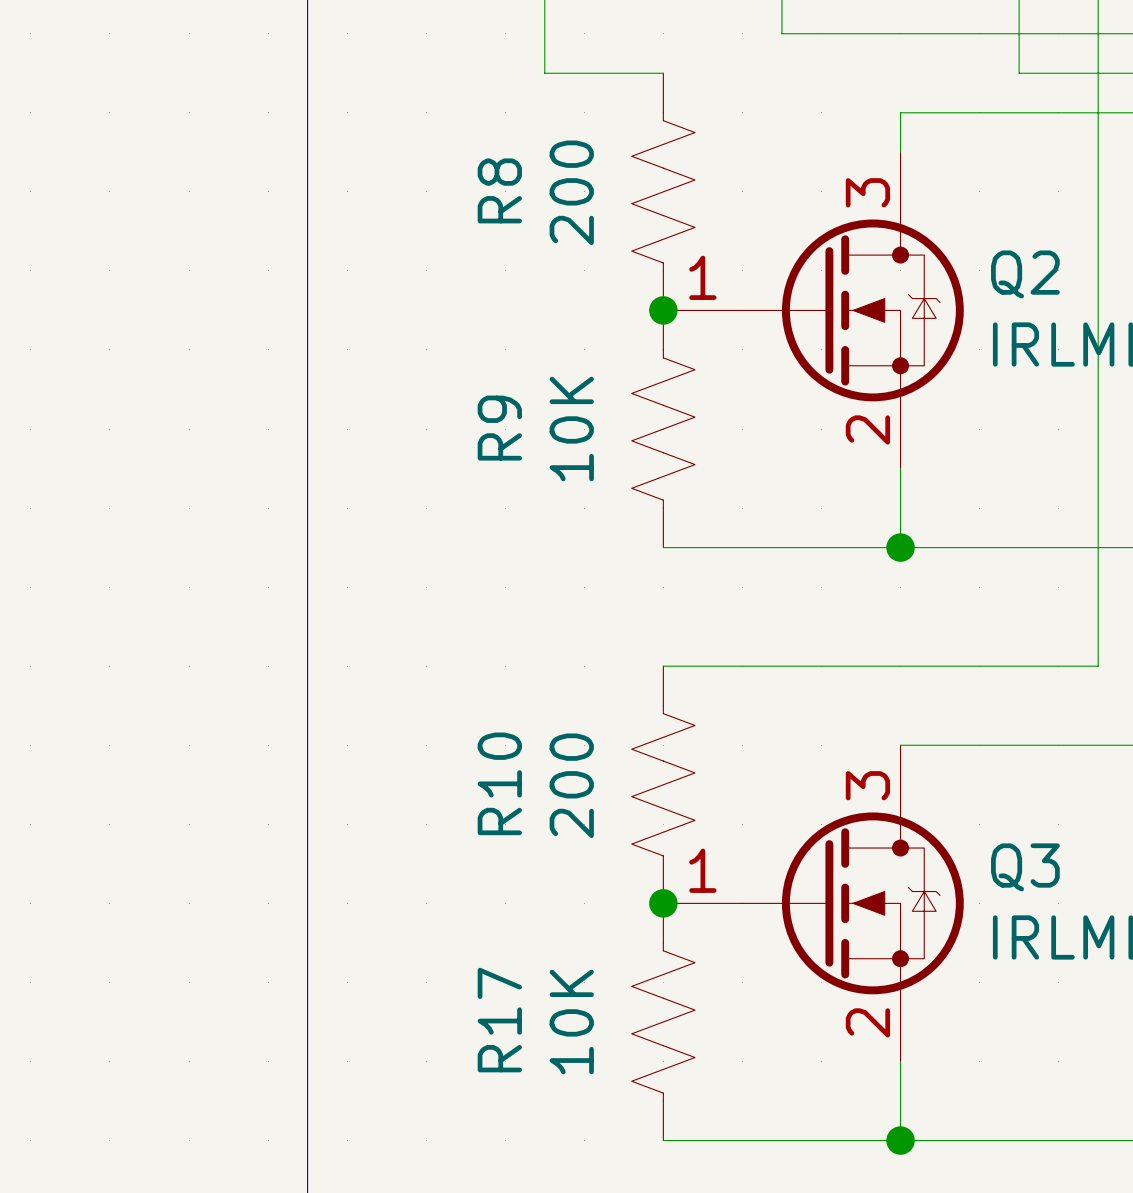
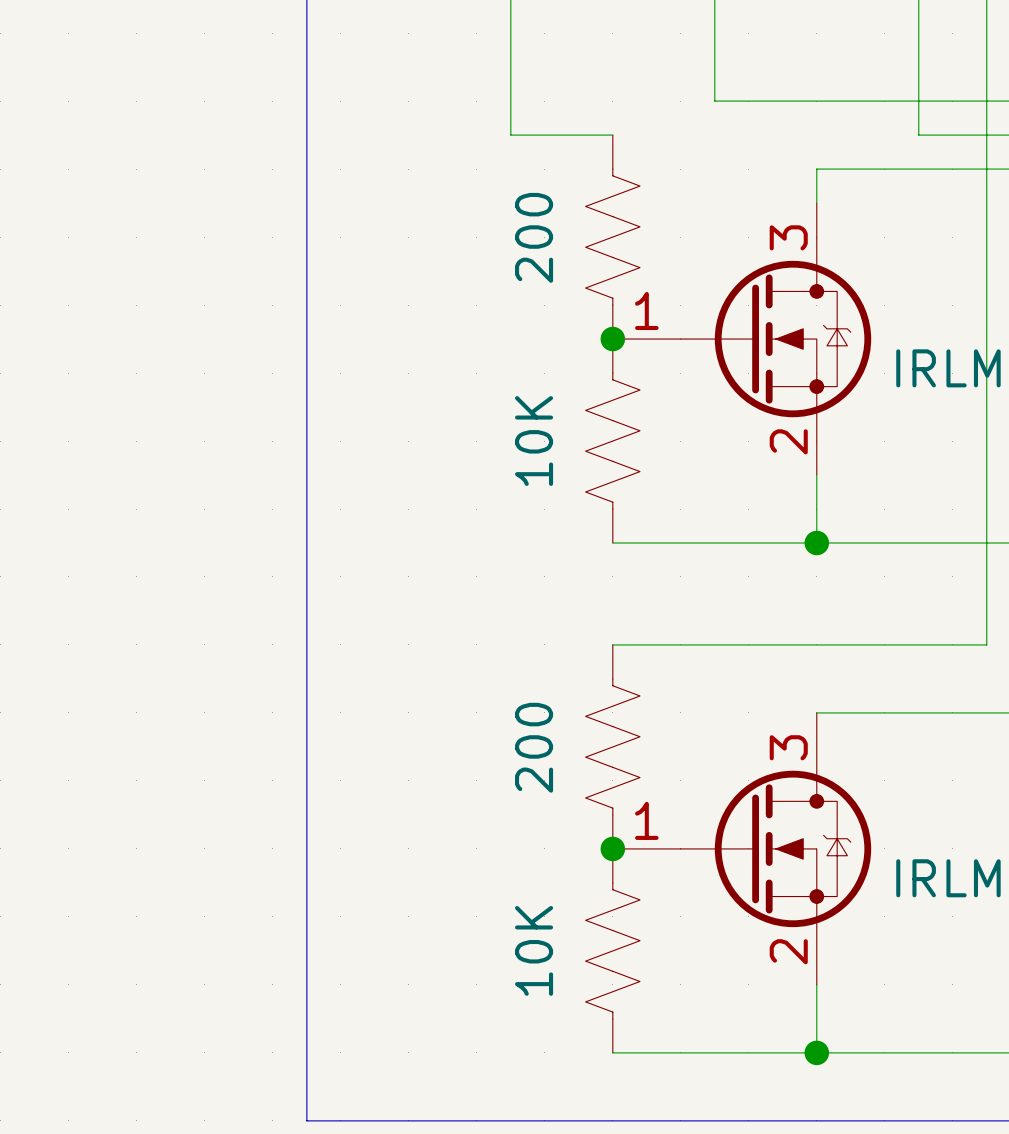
R8 name: R8 (499, 190) -> none
Q2 name: Q2 (1025, 274) -> none
R9 name: R9 (499, 428) -> none
R10 name: R10 (499, 783) -> none
Q3 name: Q3 (1025, 867) -> none
R17 name: R17 (499, 1020) -> none

